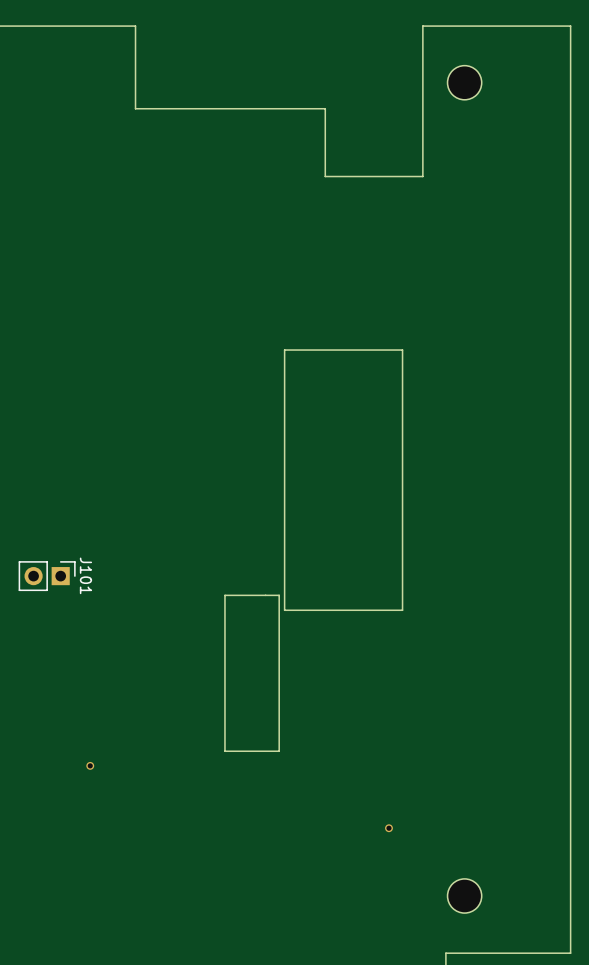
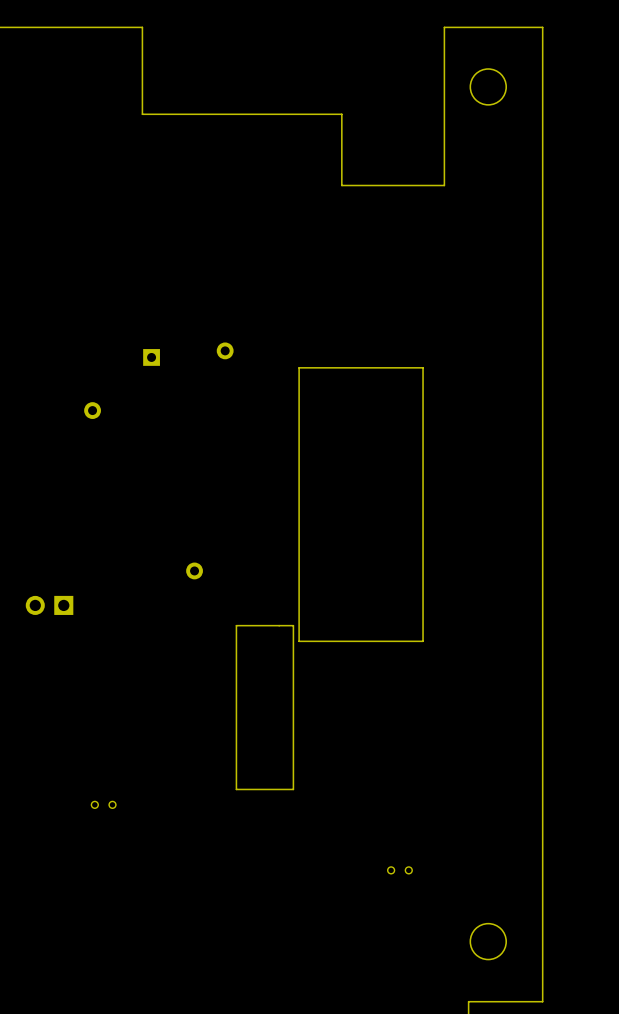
board edge: (516, 26) (570, 26) (570, 953) (516, 953) -> (542, 27) (542, 1001)
part: none -> (225, 350)
part: none -> (151, 357)
part: none -> (92, 410)
part: none -> (194, 570)
J101 side: bottom (47, 576) -> top (49, 605)
part: none -> (112, 804)
part: none -> (391, 870)

